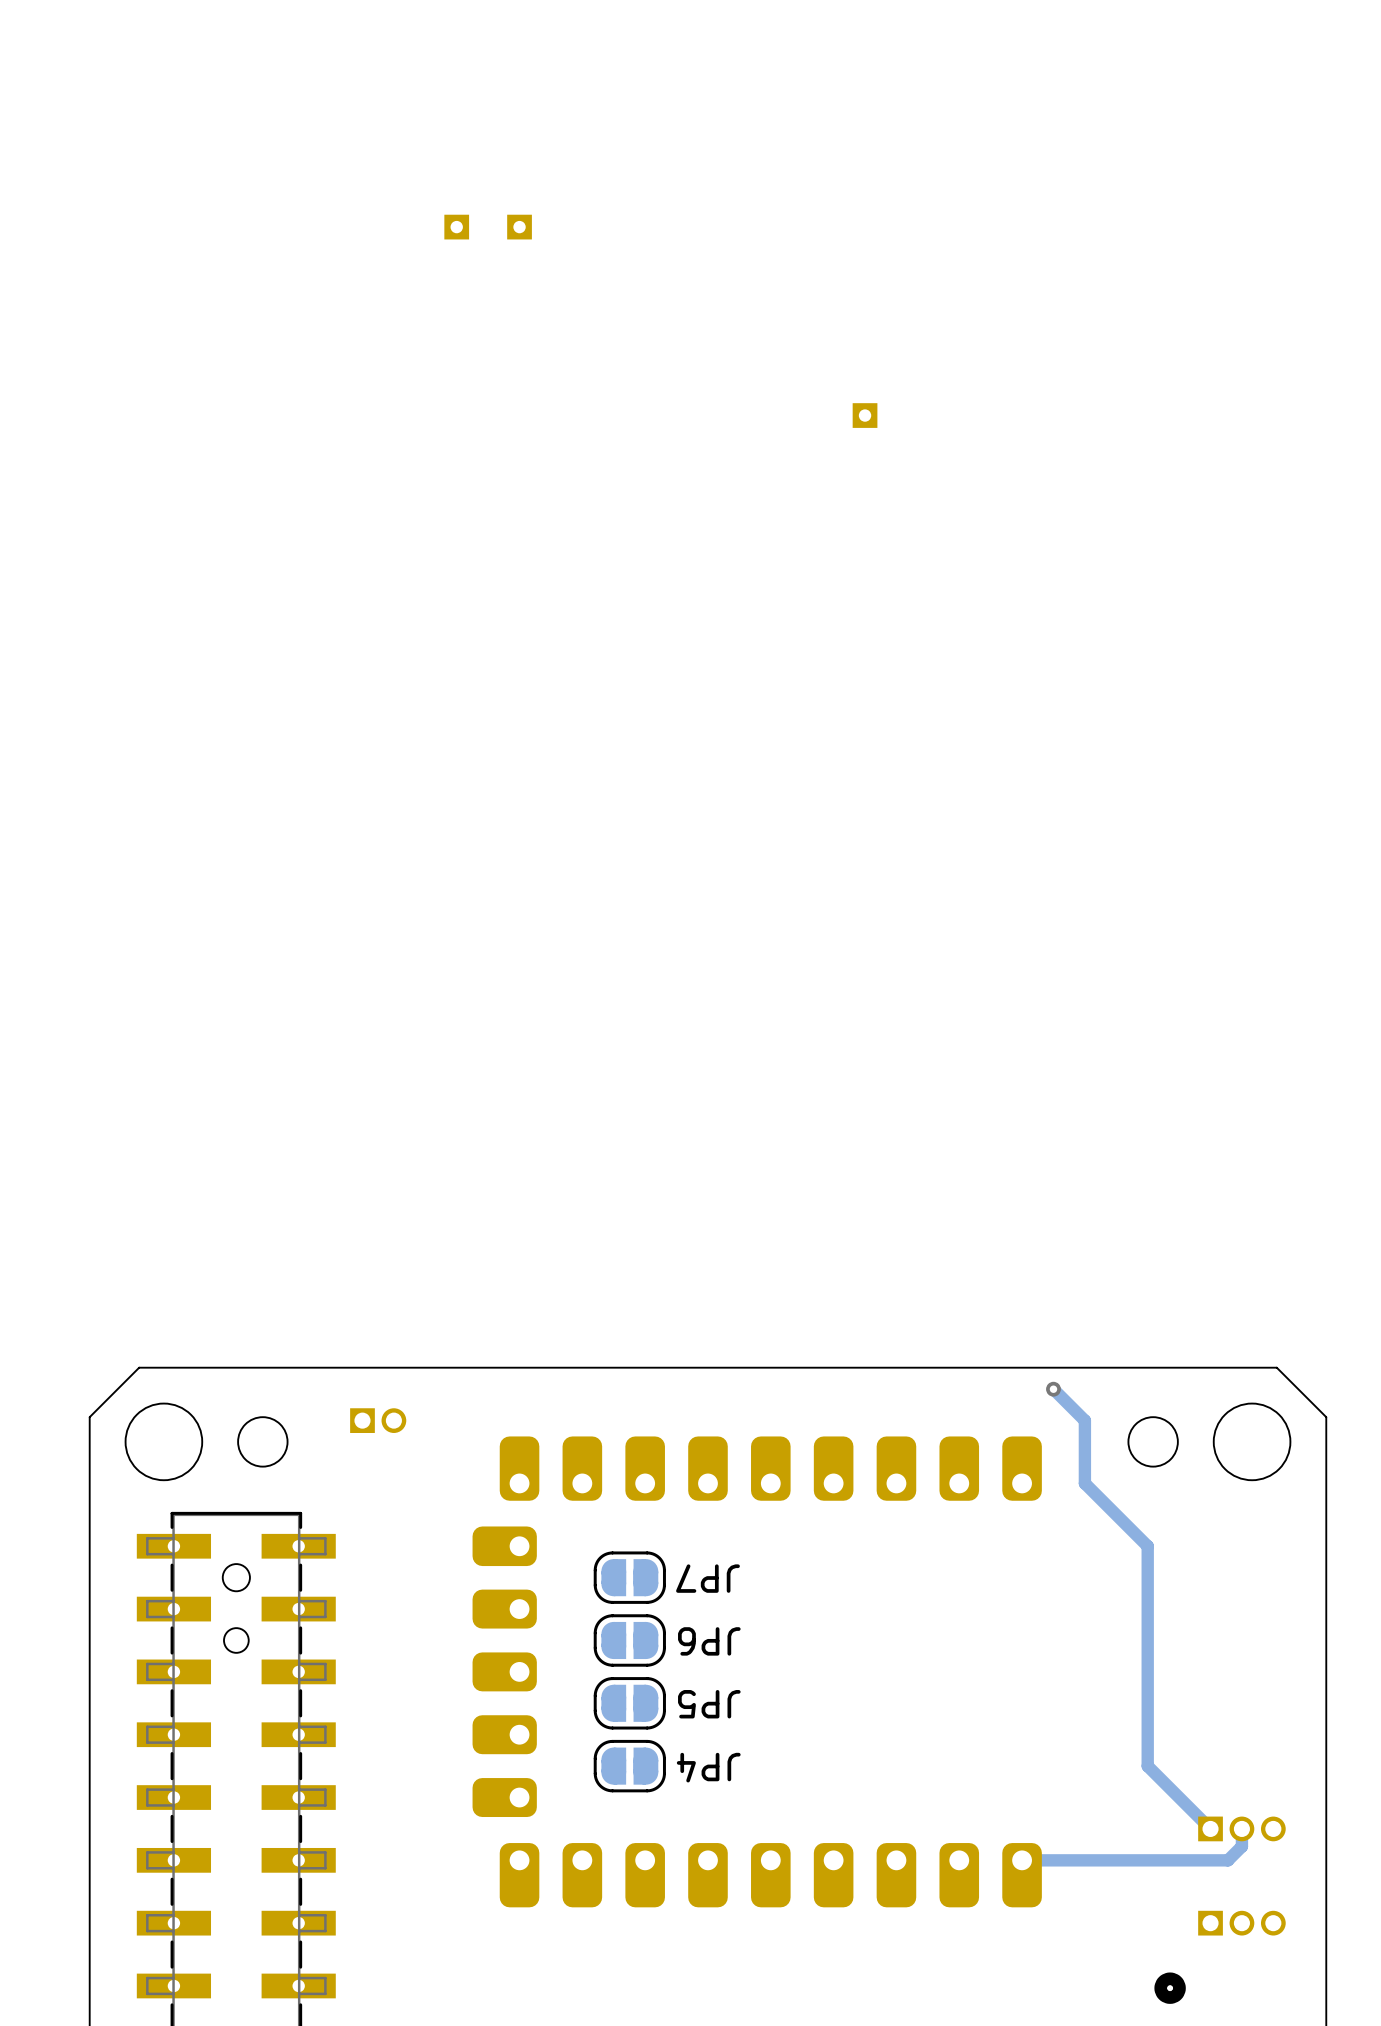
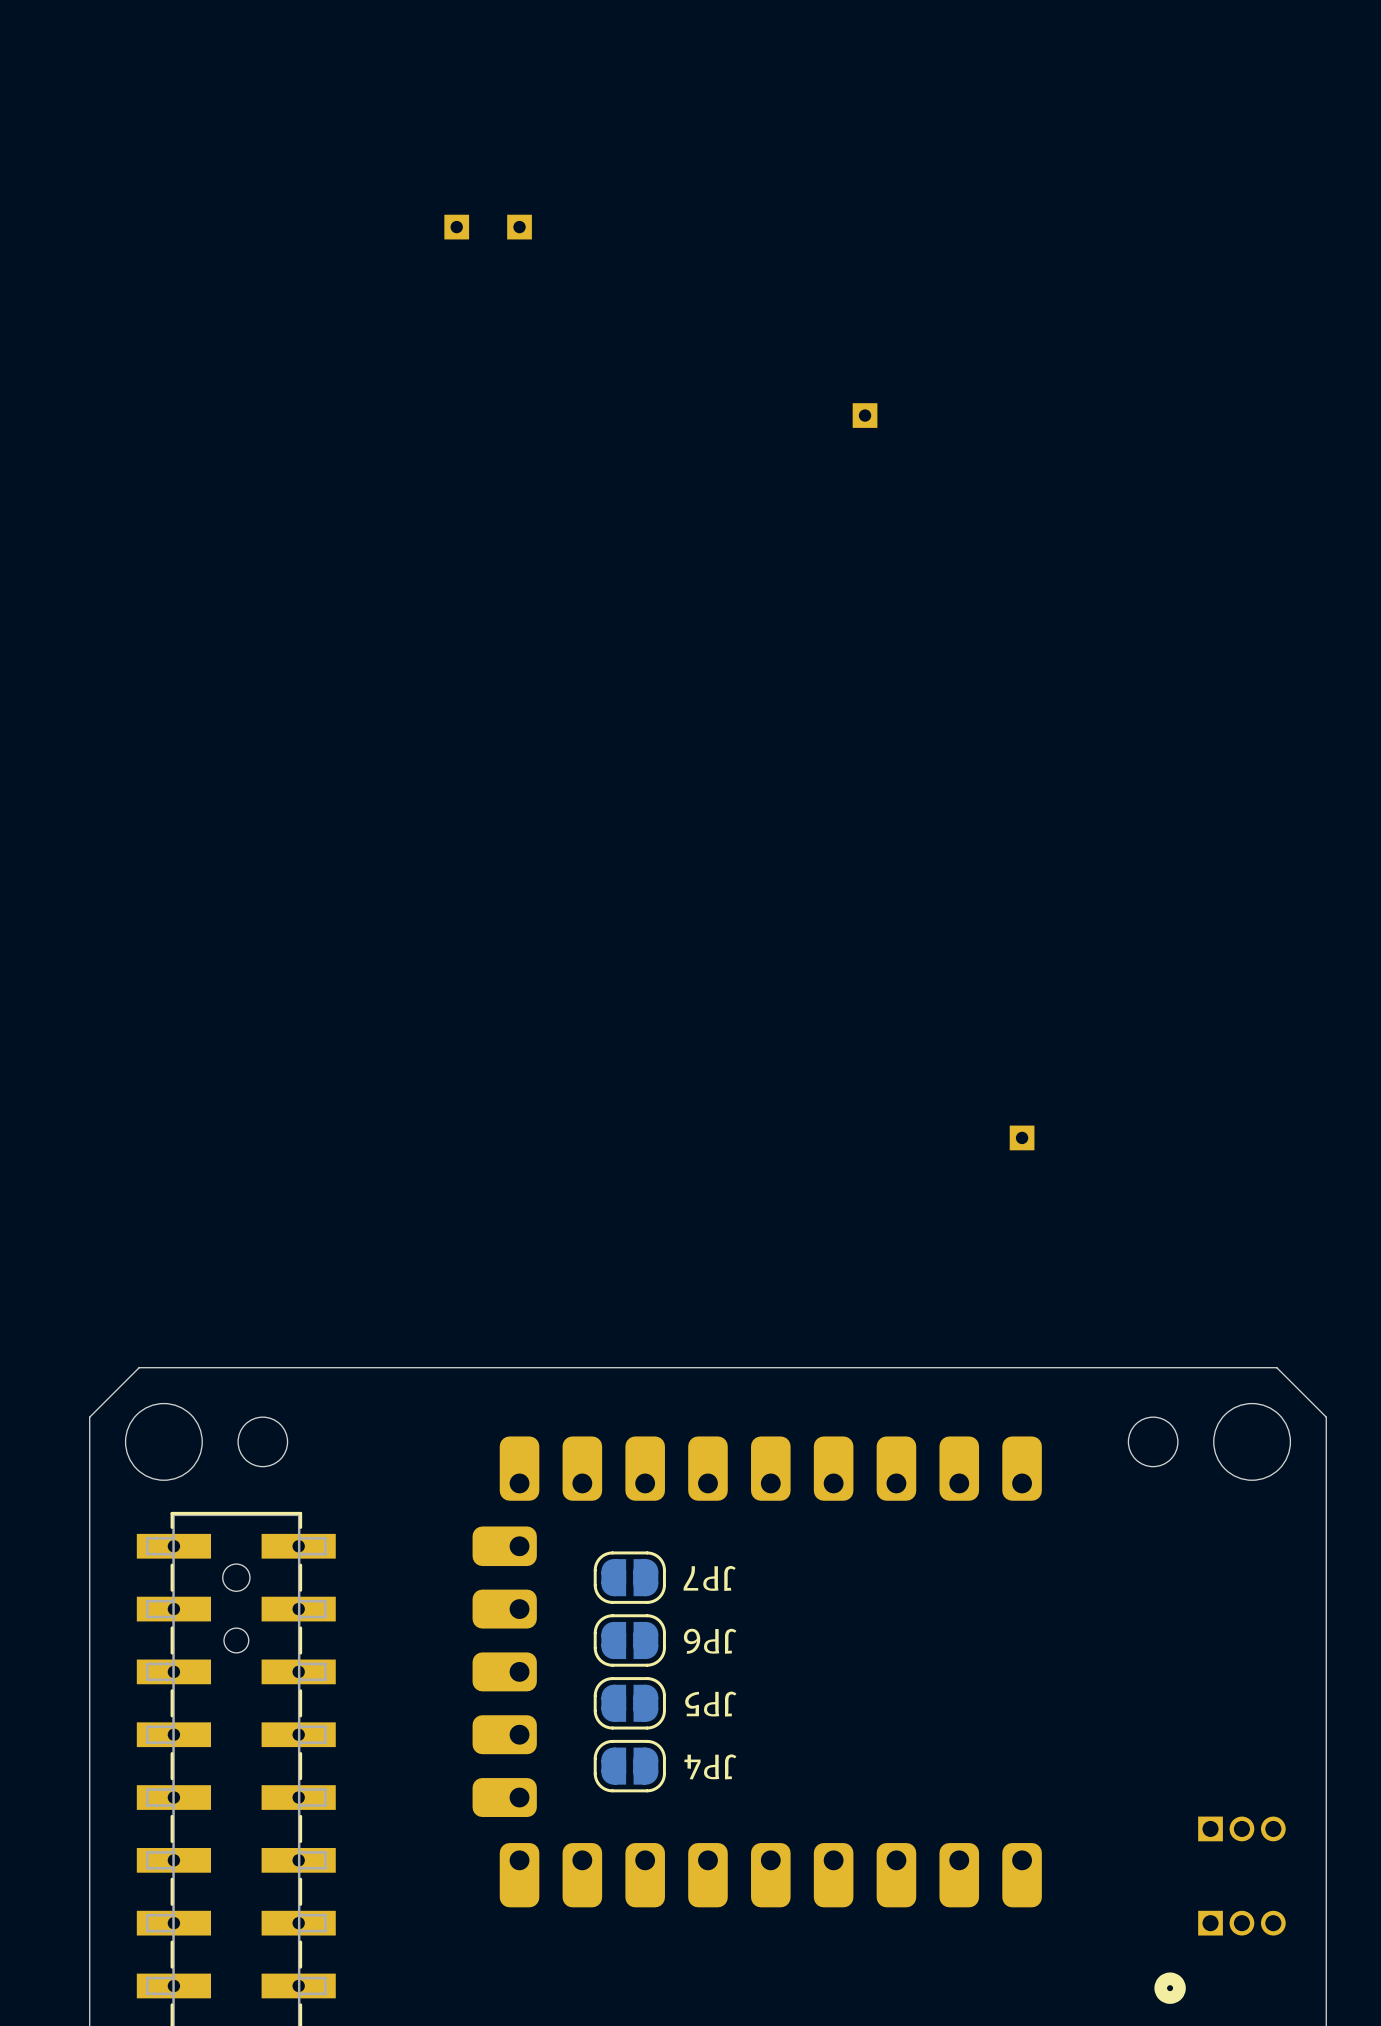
part: none -> (1022, 1137)
track: (1053, 1389) (1084, 1420) (1084, 1483) (1147, 1546) (1147, 1766) (1210, 1828) -> none
via: (1053, 1389) -> none
part: (378, 1420) -> none
track: (1241, 1828) (1241, 1846) (1228, 1860) (1022, 1860) -> none

